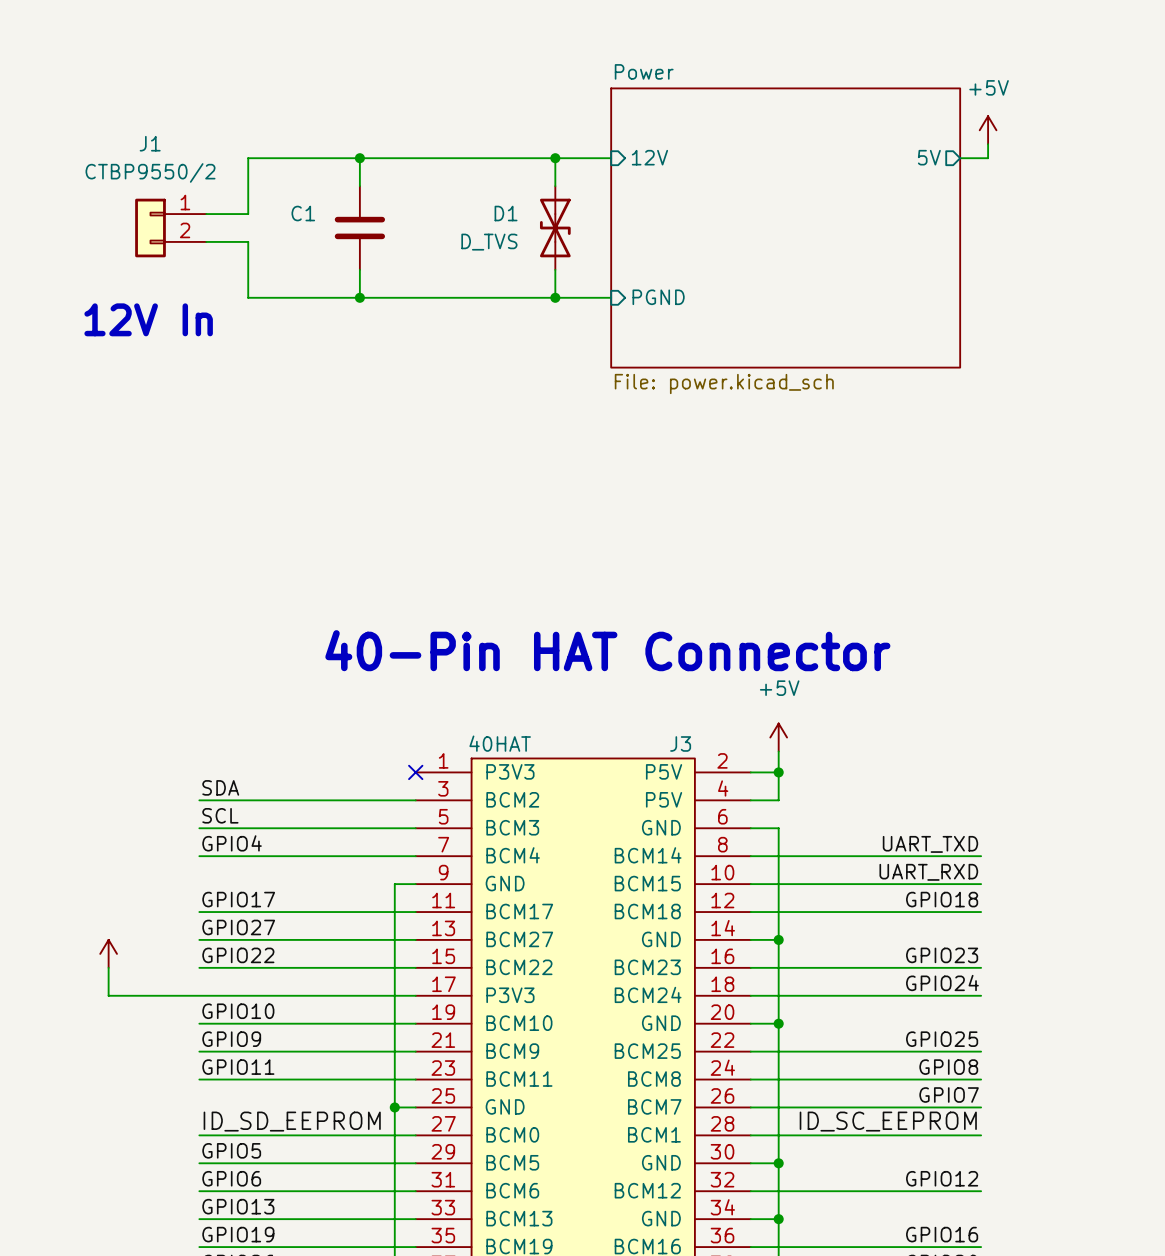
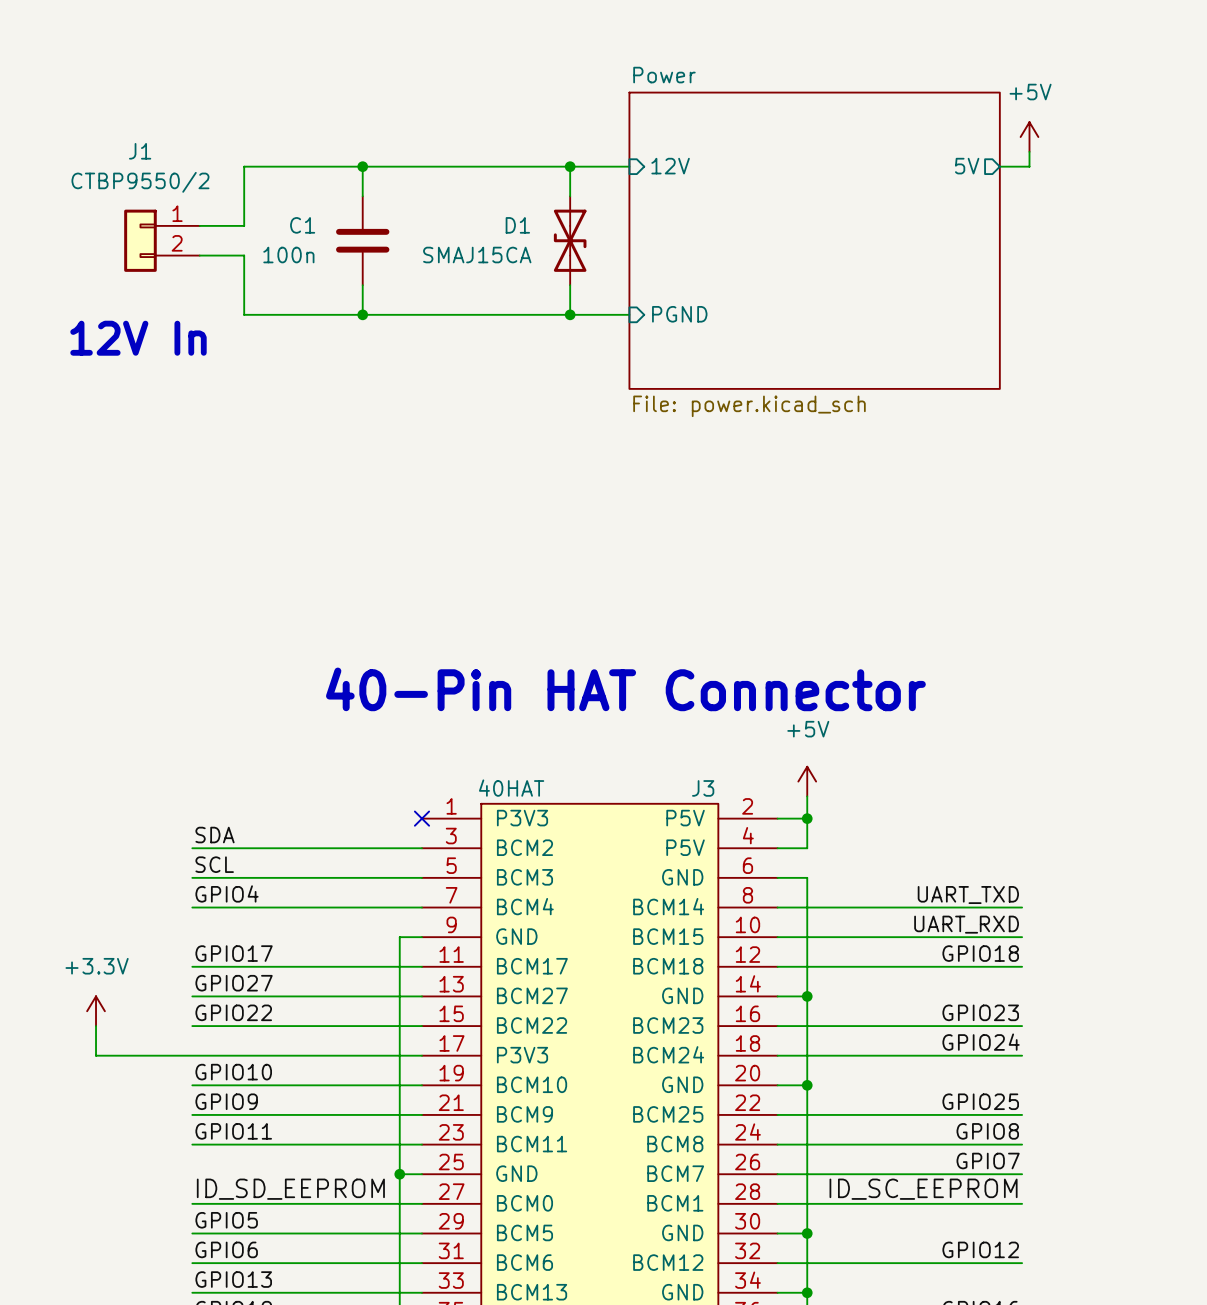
C1 value: none -> 100n (288, 255)
D1 value: D_TVS (489, 242) -> SMAJ15CA (477, 255)
power symbol text: none -> +3.3V (97, 966)

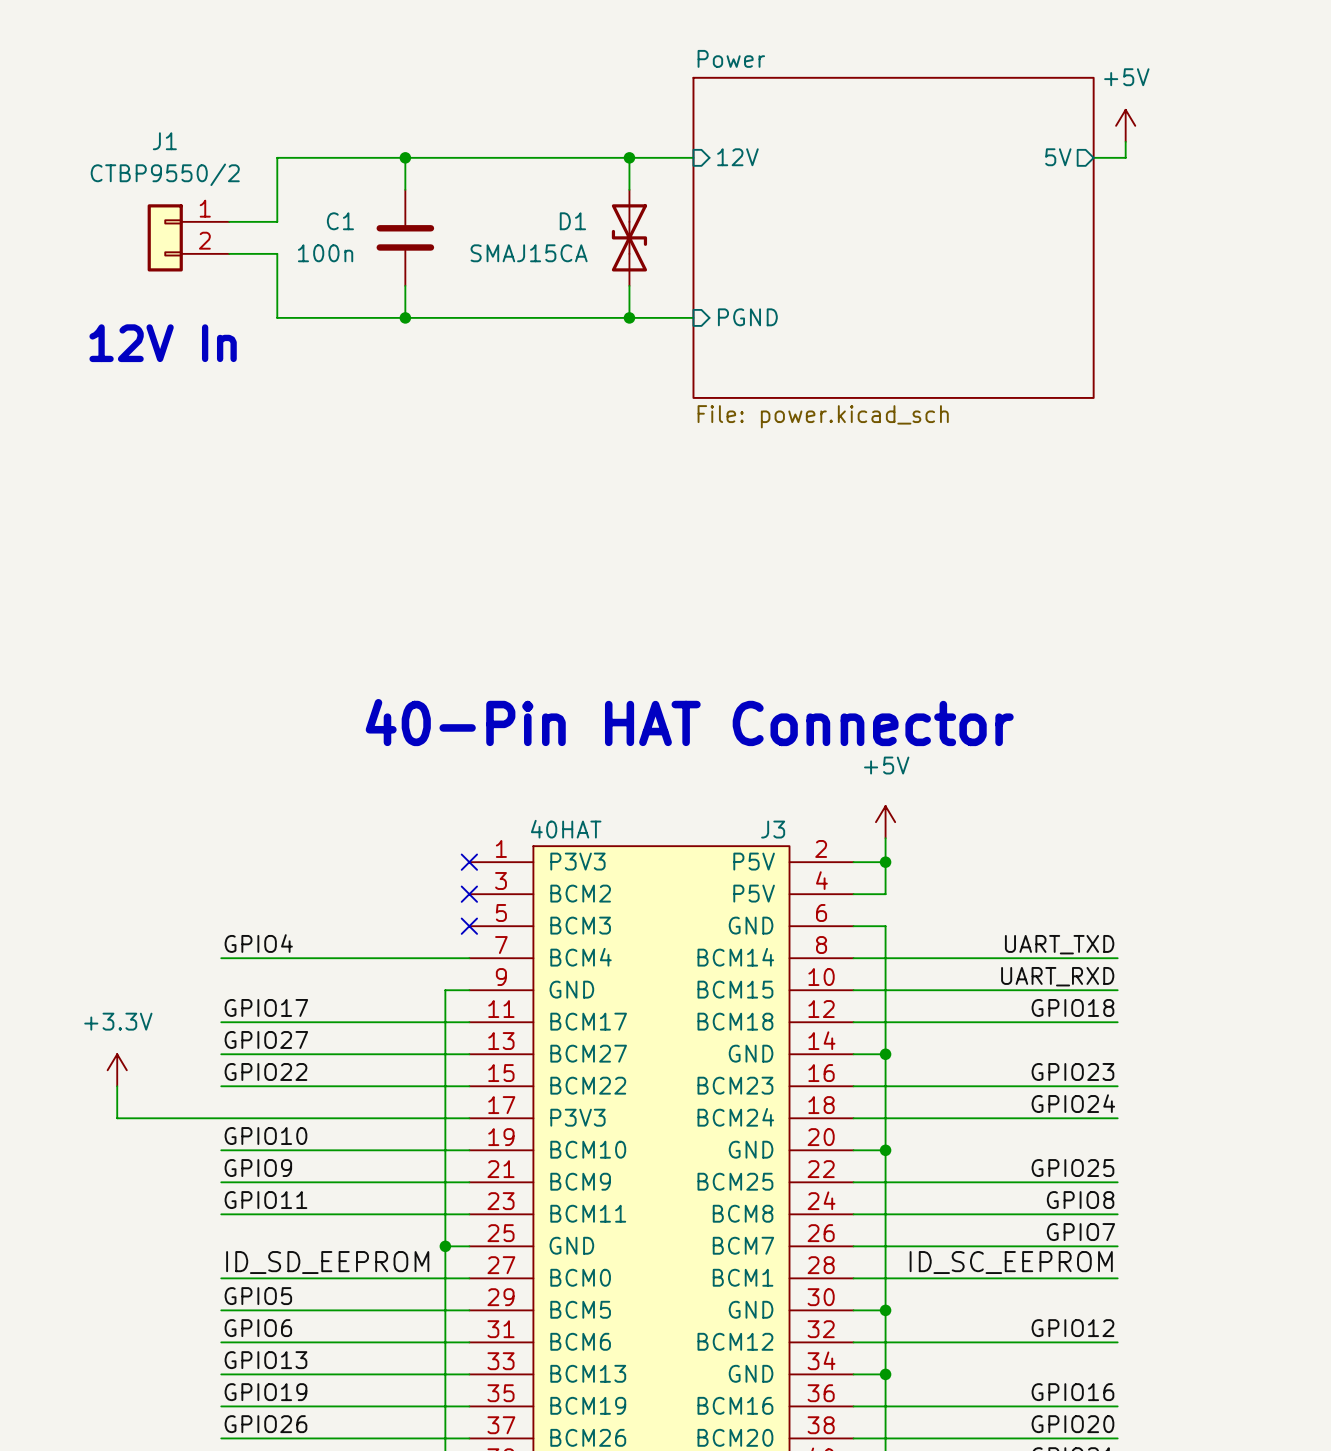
label: SDA (215, 835) -> none
wire: (192, 848) (421, 848) -> none
no-connect mark: none -> (469, 894)
label: SCL (214, 864) -> none
wire: (192, 877) (421, 877) -> none
no-connect mark: none -> (469, 926)

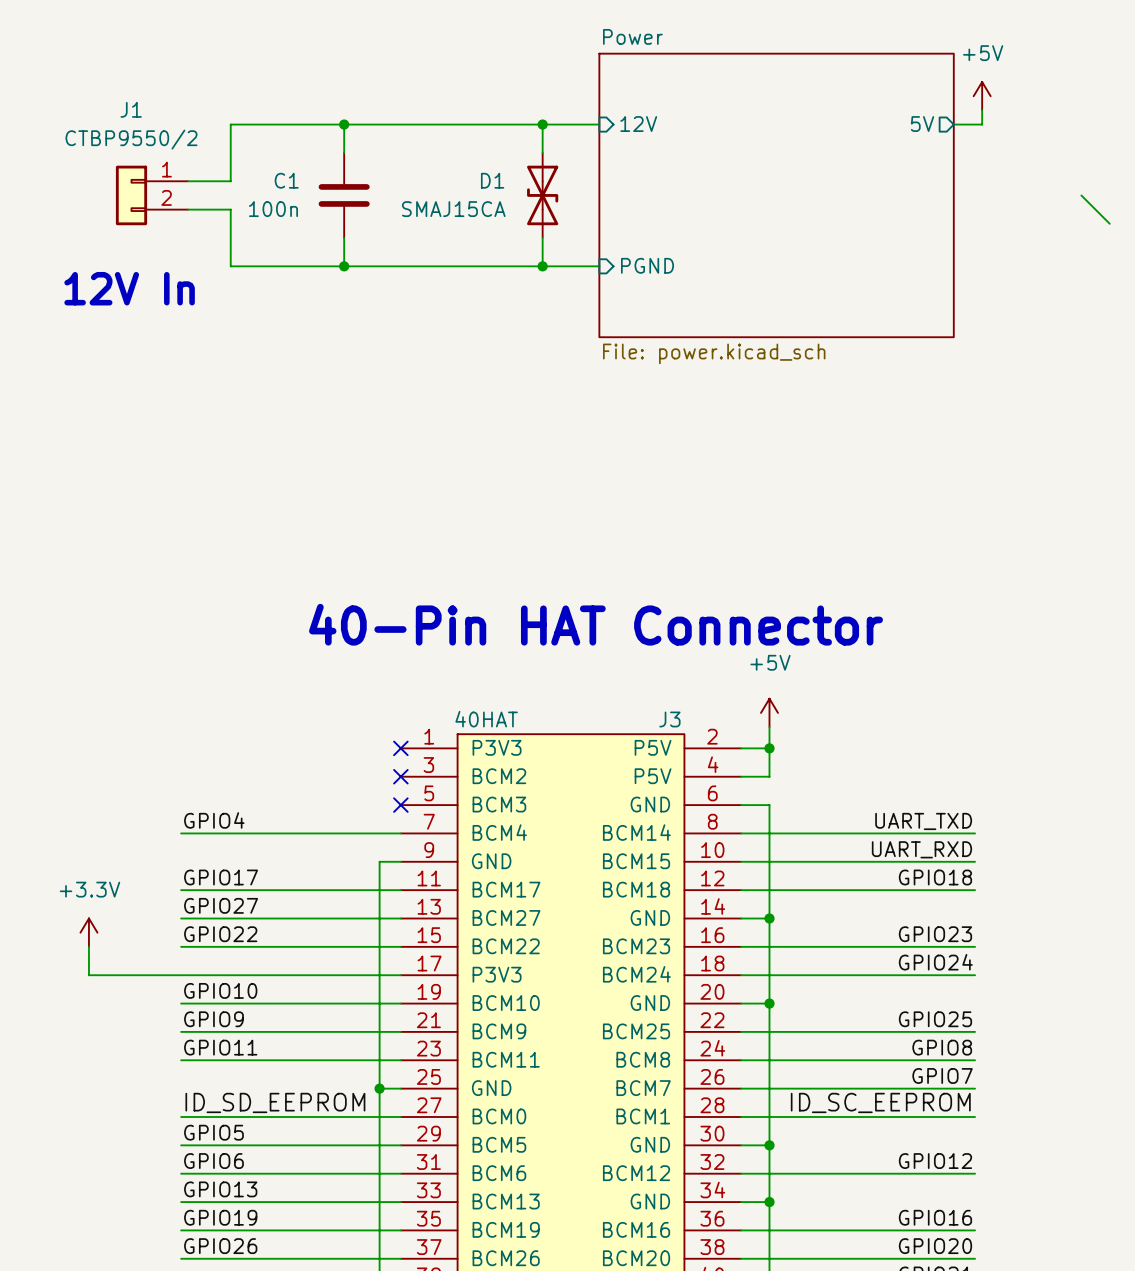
wire: none -> (1081, 195) (1109, 223)

